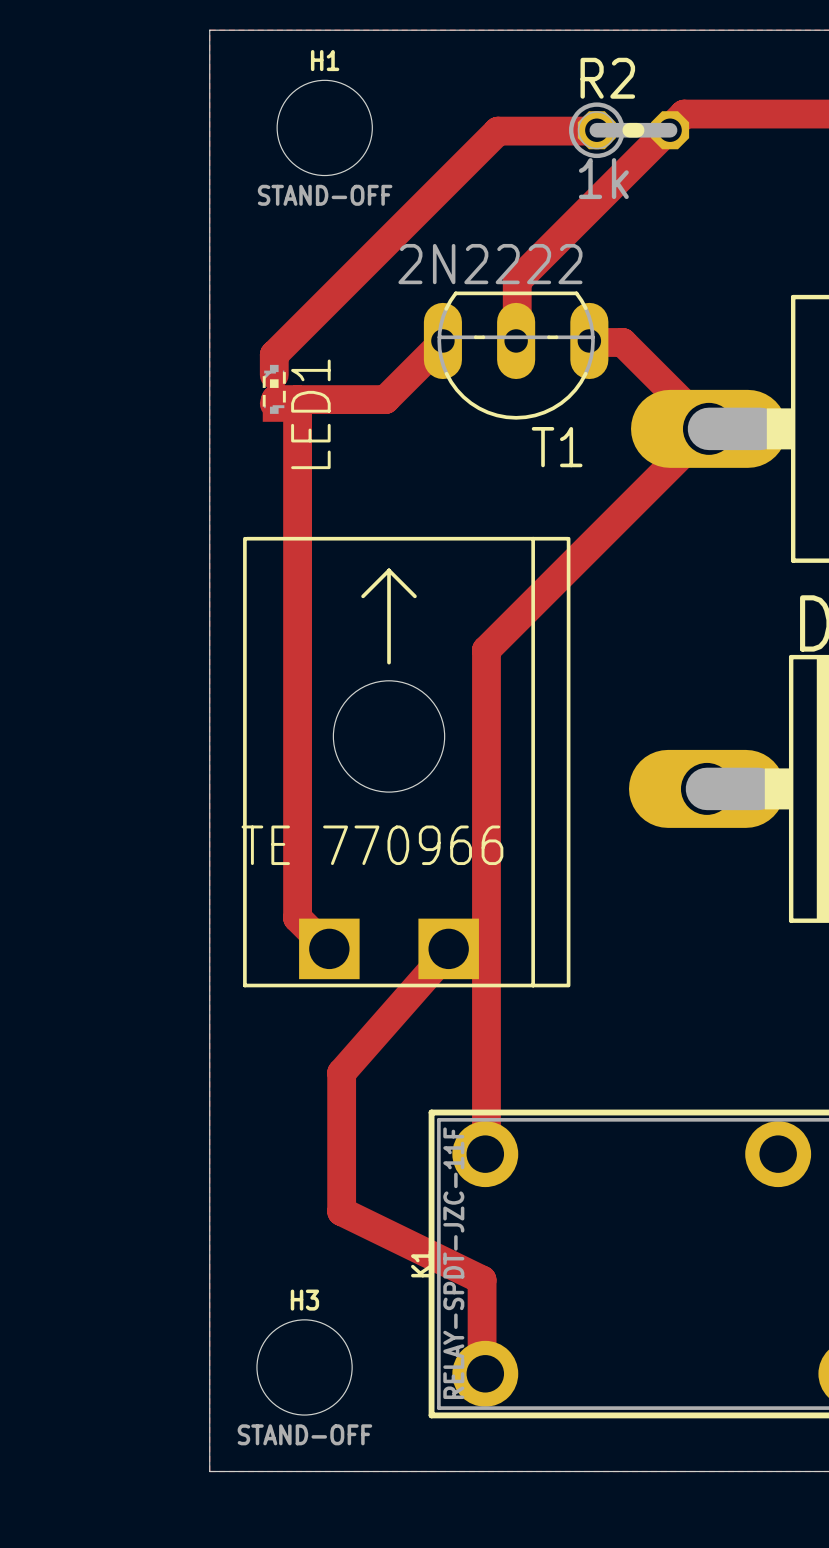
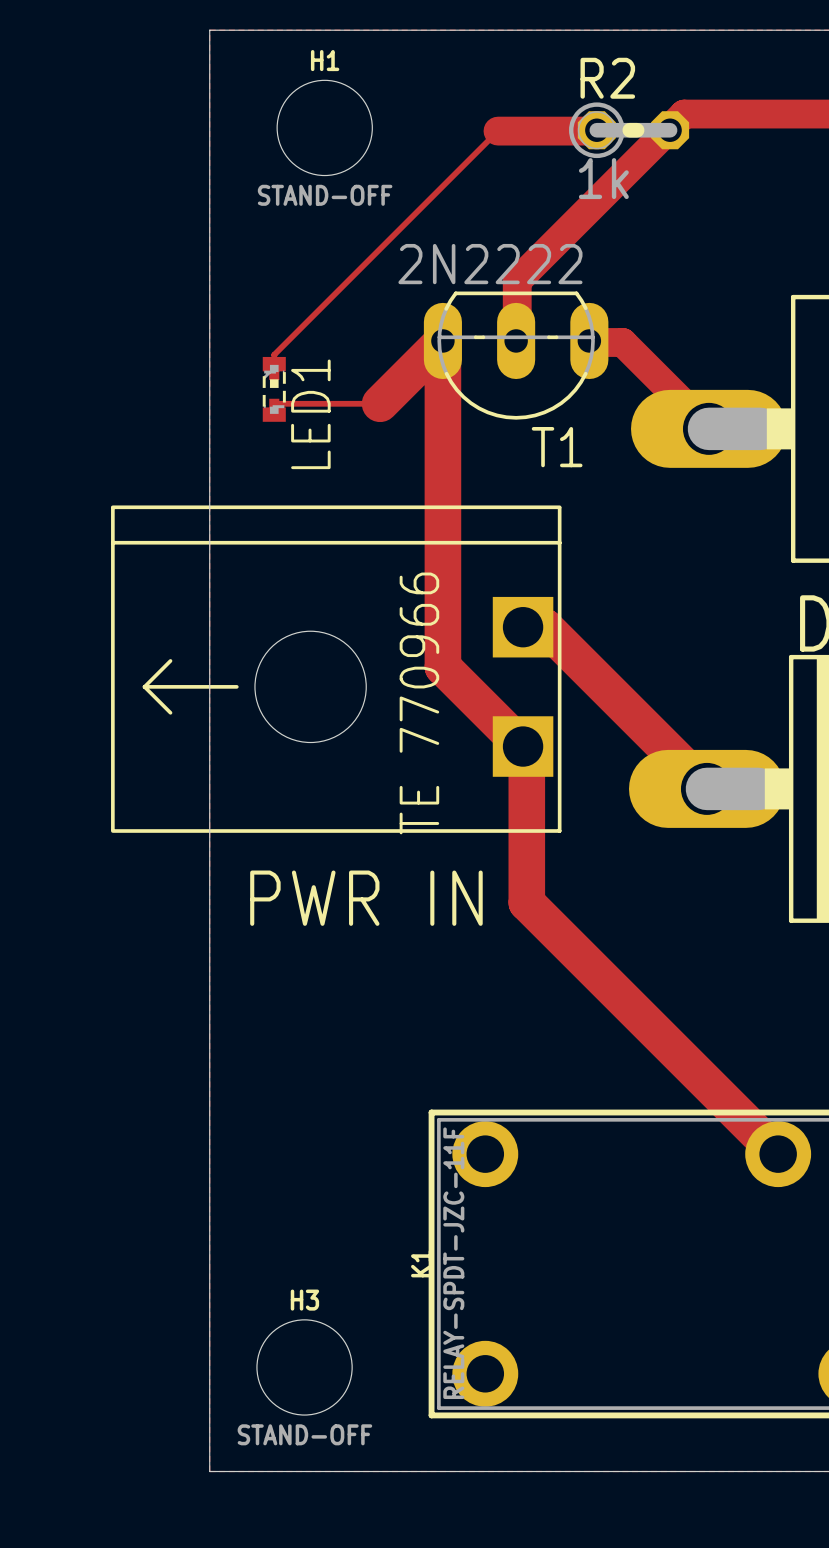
track width: thick (497, 131) (274, 354) (274, 374) -> thin (497, 131) (274, 354) (274, 374)
track: (442, 340) (385, 399) (275, 399) (274, 403) -> (778, 1154) (526, 902) (526, 750) (442, 666) (442, 340) (380, 403) (274, 403)
track: (297, 399) (297, 917) (329, 948) -> none
track: (708, 428) (486, 650) (485, 1154) -> none
track: none -> (523, 627) (545, 627) (706, 788)
part rotation: 0° (406, 762) -> 90° counterclockwise (336, 669)
text: none -> PWR IN (366, 898)
track: (448, 948) (341, 1072) (341, 1211) (482, 1279) (482, 1370) (485, 1373) -> none

